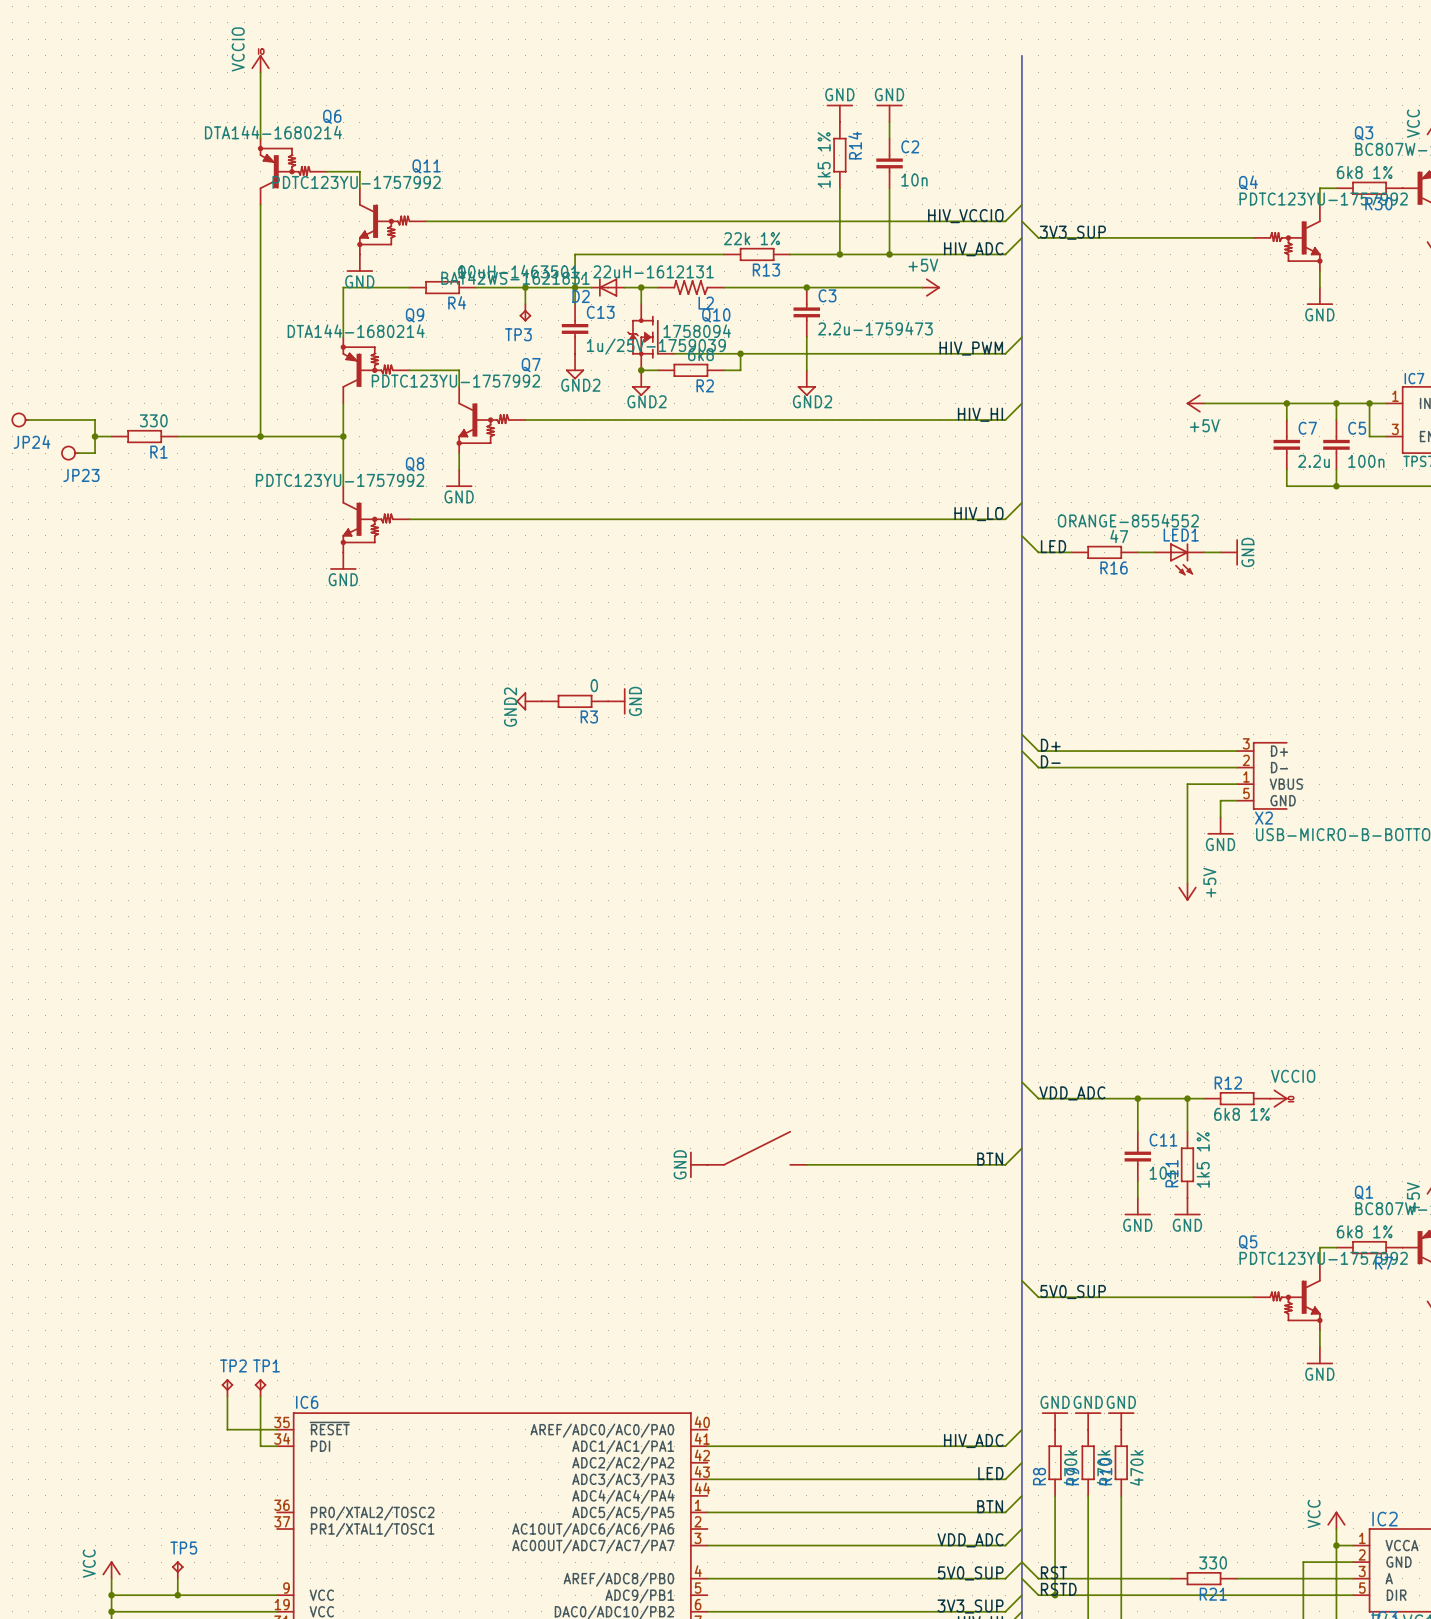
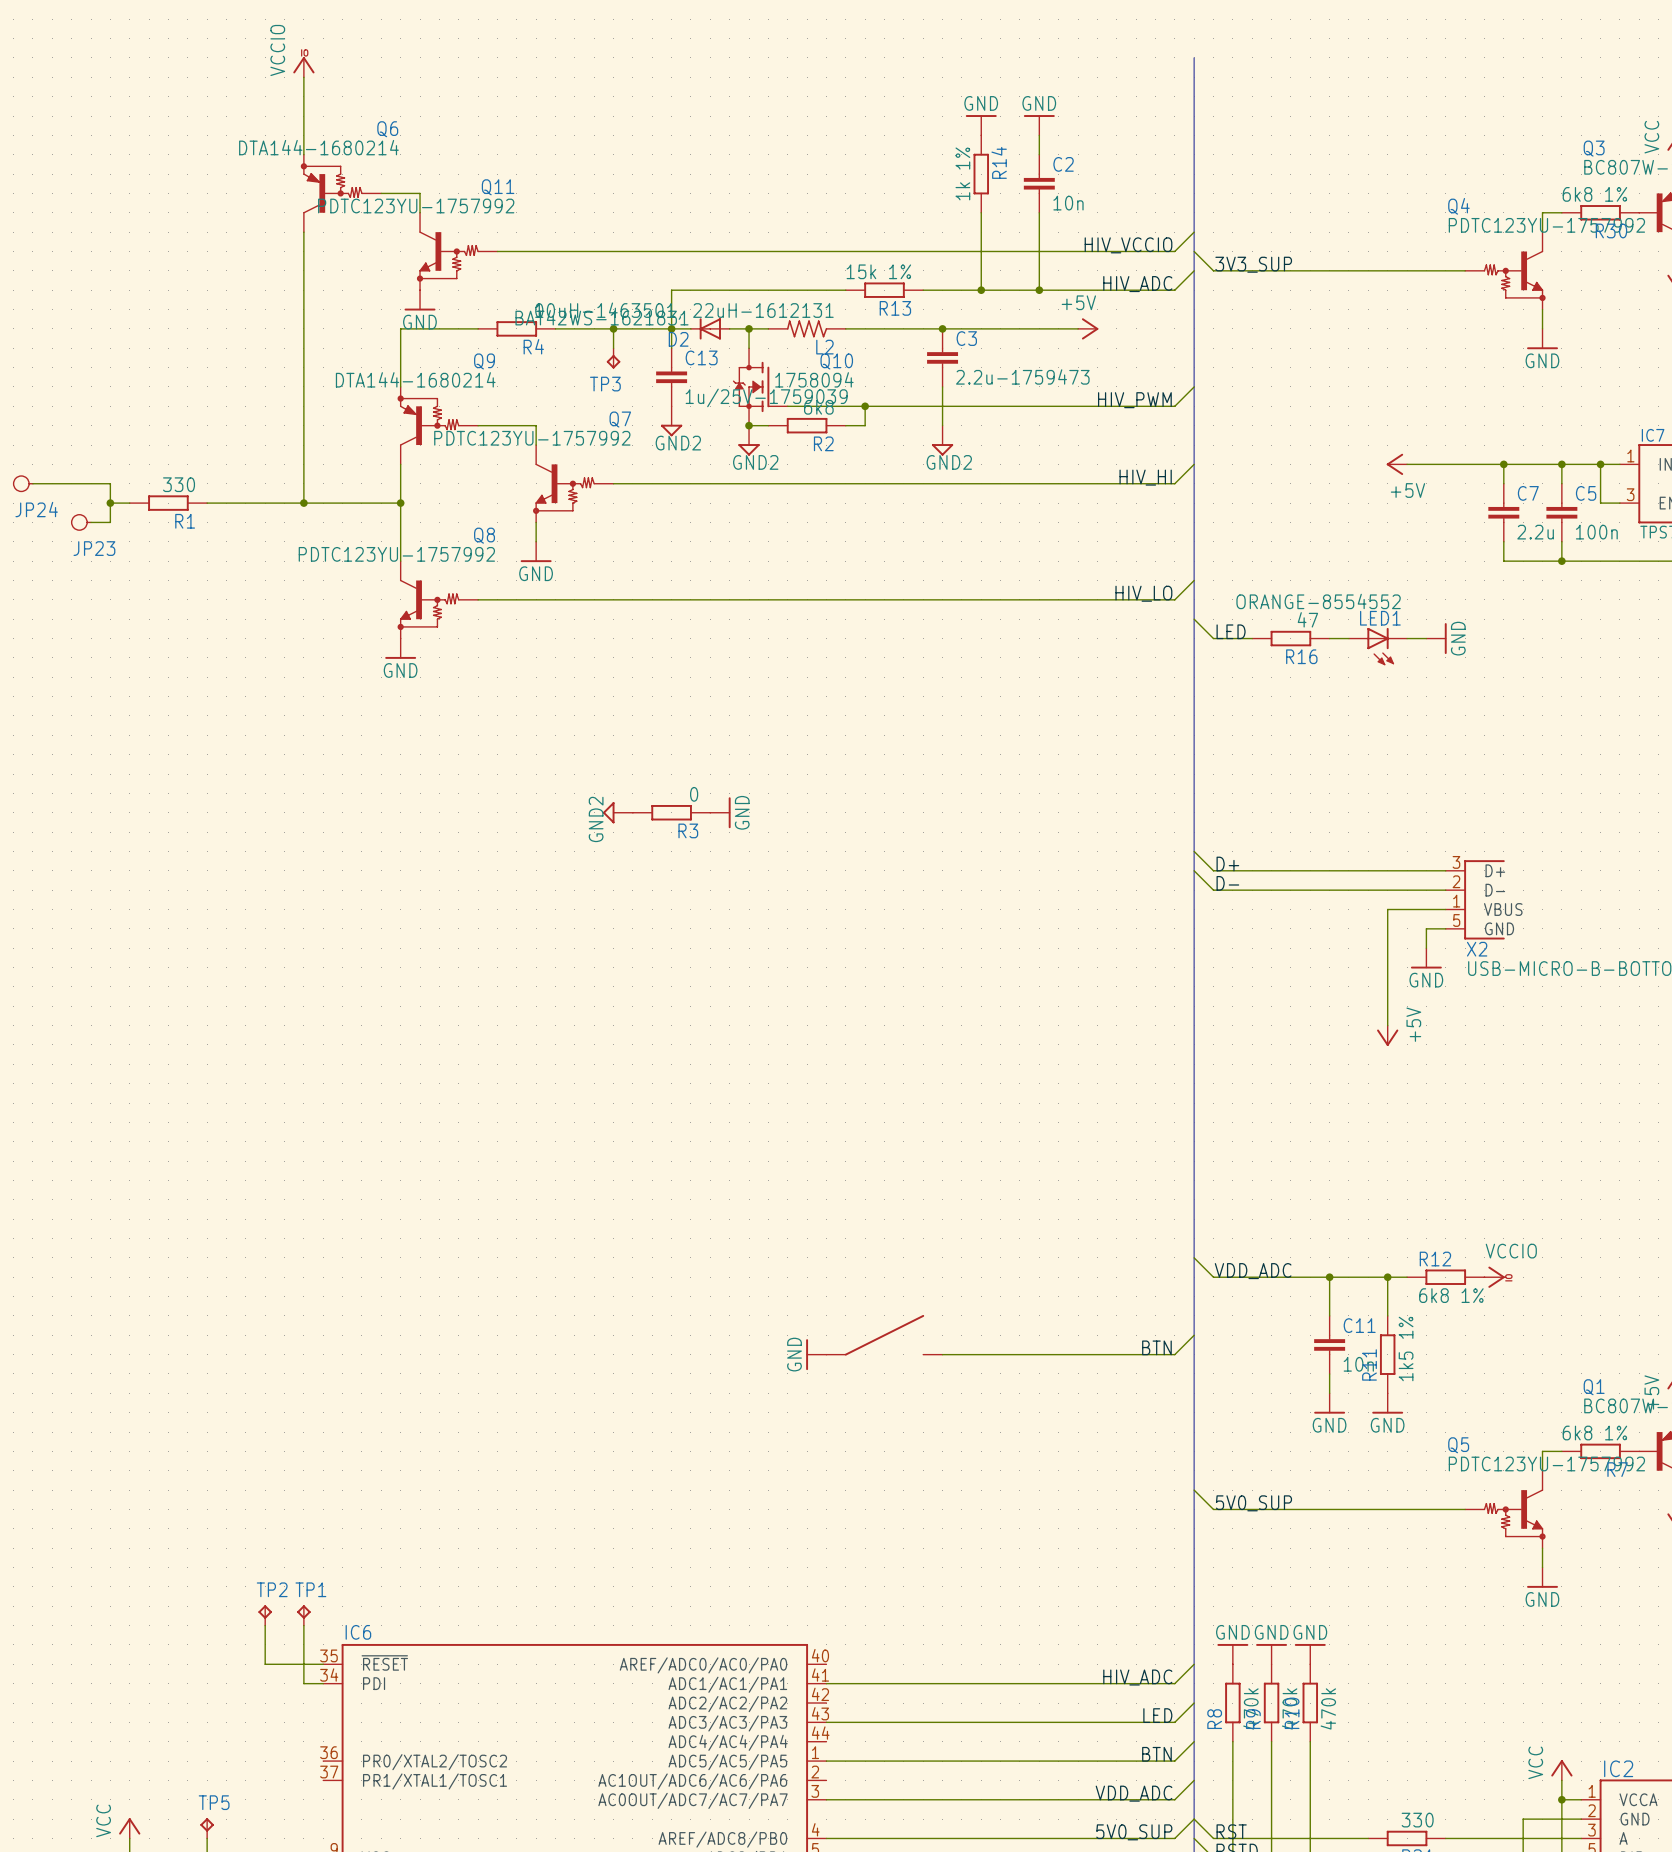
R14 value: 1k5 1% (824, 159) -> 1k 1% (962, 173)
R13 value: 22k 1% (752, 238) -> 15k 1% (878, 271)

